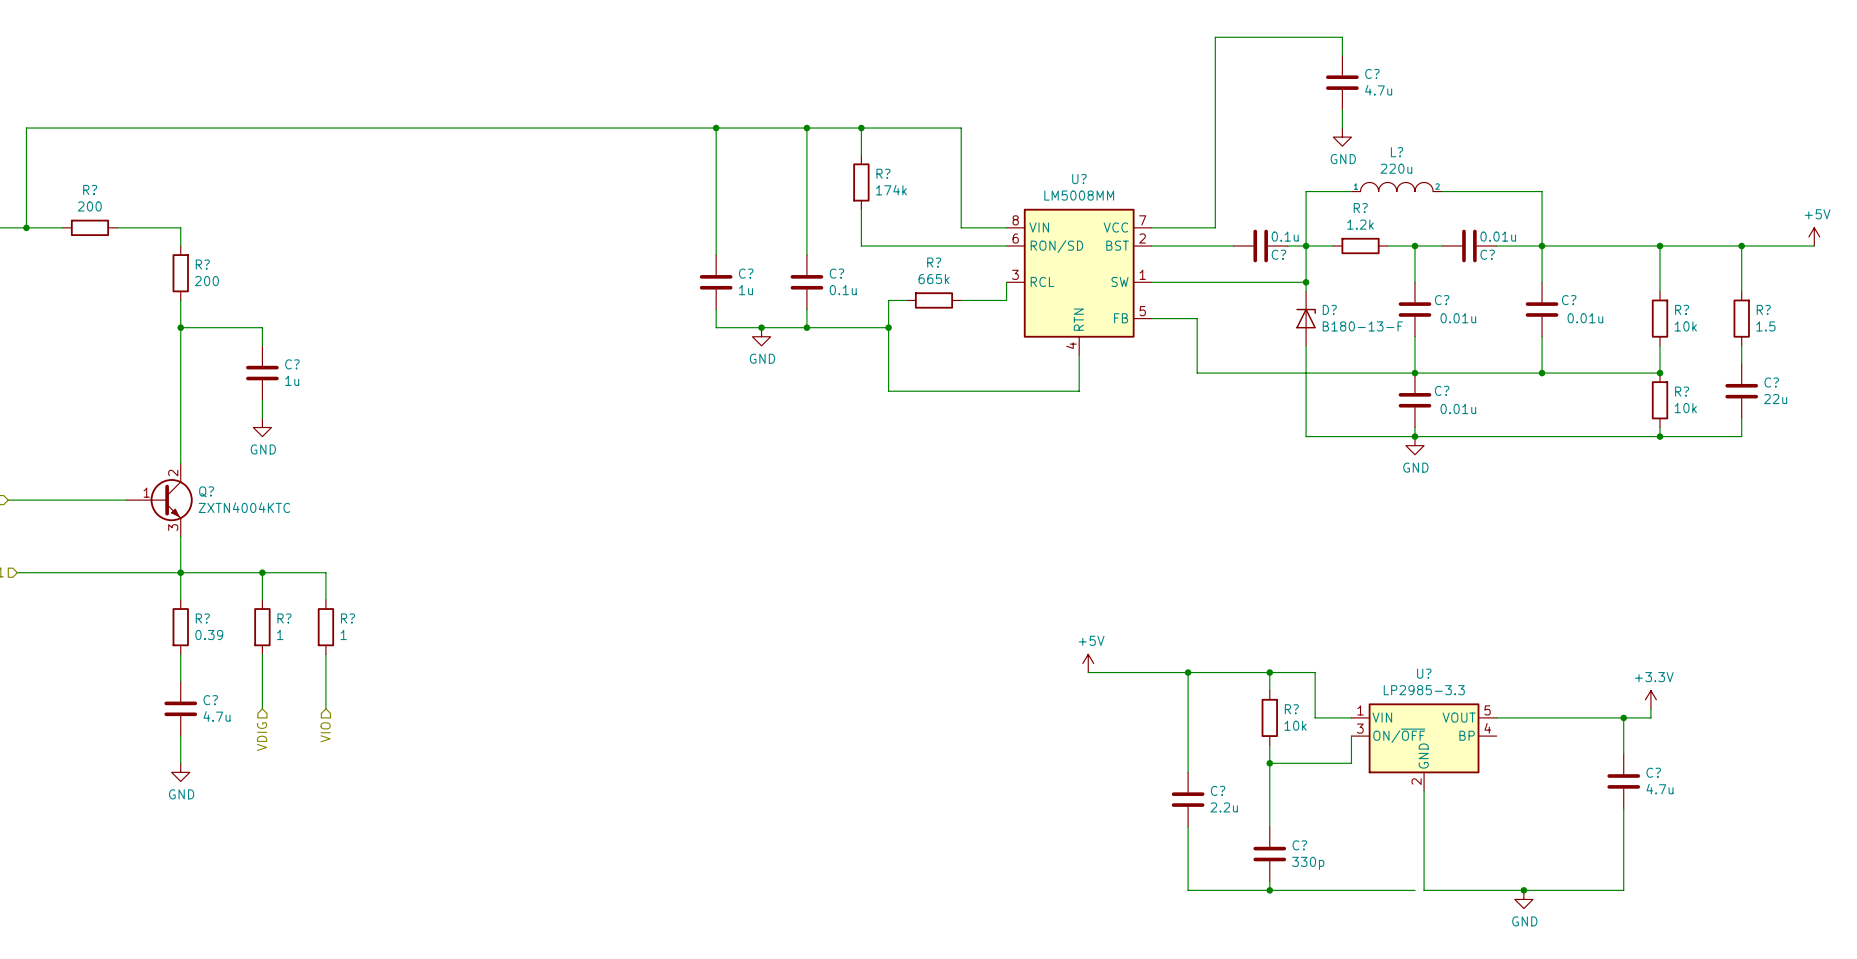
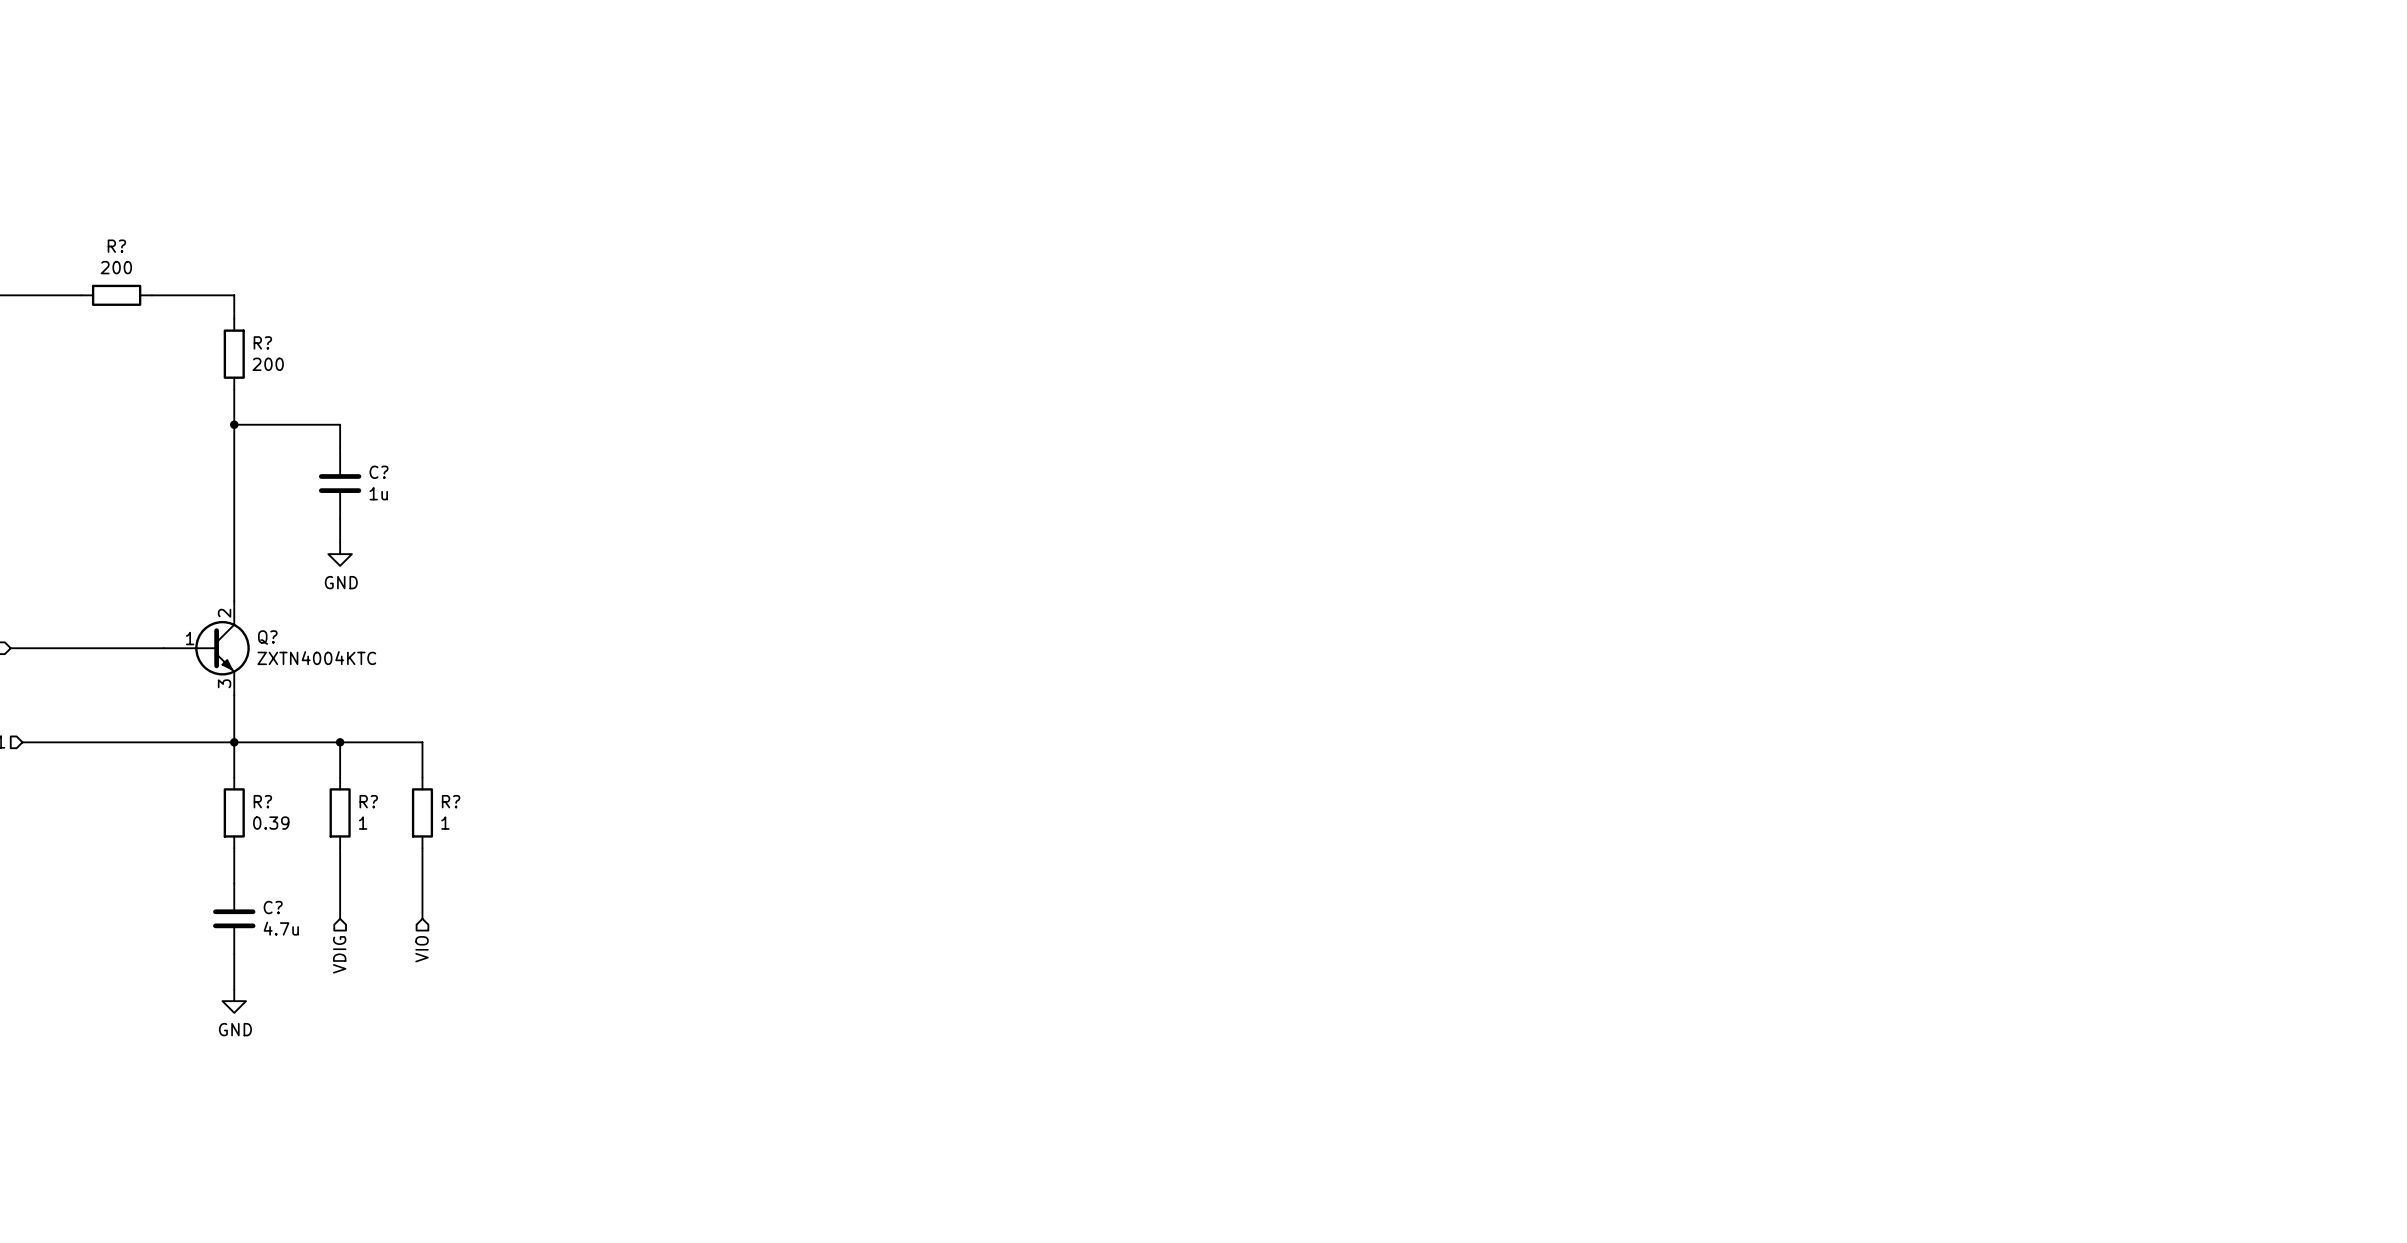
wire: (1342, 55) (1342, 37) (1215, 37) (1215, 227) (1151, 227) -> none
C?: 4.7u (1342, 82) -> none
wire: (1342, 109) (1342, 128) -> none
wire: (716, 128) (716, 255) -> none
junction: (716, 128) -> none
wire: (806, 128) (806, 255) -> none
junction: (806, 128) -> none
wire: (861, 128) (861, 155) -> none
junction: (861, 128) -> none
power symbol: GND (1342, 137) -> none
R?: 174k (861, 182) -> none
L?: 220u (1396, 187) -> none
wire: (1351, 191) (1306, 191) (1306, 291) -> none
wire: (1442, 191) (1542, 191) (1542, 282) -> none
wire: (861, 209) (861, 246) (1006, 246) -> none
wire: (26, 227) (26, 128) (961, 128) (961, 227) (1006, 227) -> none
junction: (26, 227) -> none
power symbol: +5V (1814, 236) -> none
wire: (1151, 246) (1233, 246) -> none
C?: 0.1u (1260, 246) -> none
wire: (1287, 246) (1333, 246) -> none
junction: (1306, 246) -> none
R?: 1.2k (1360, 246) -> none
wire: (1387, 246) (1442, 246) -> none
wire: (1414, 246) (1414, 282) -> none
junction: (1414, 246) -> none
C?: 0.01u (1469, 246) -> none
wire: (1496, 246) (1814, 246) -> none
junction: (1542, 246) -> none
wire: (1660, 246) (1660, 291) -> none
junction: (1660, 246) -> none
wire: (1741, 246) (1741, 291) -> none
junction: (1741, 246) -> none
U?: LM5008MM (1079, 281) -> none
C?: 1u (716, 282) -> none
C?: 0.1u (806, 282) -> none
wire: (1006, 282) (1006, 300) (961, 300) -> none
wire: (1151, 282) (1306, 282) -> none
junction: (1306, 282) -> none
wire: (906, 300) (888, 300) (888, 391) (1079, 391) (1079, 354) -> none
R?: 665k (933, 300) -> none
wire: (716, 309) (716, 327) (888, 327) -> none
wire: (806, 309) (806, 327) -> none
C?: 0.01u (1414, 309) -> none
C?: 0.01u (1542, 309) -> none
wire: (1151, 318) (1197, 318) (1197, 373) (1660, 373) (1660, 345) -> none
D?: B180-13-F (1306, 318) -> none
R?: 10k (1660, 318) -> none
R?: 1.5 (1741, 318) -> none
junction: (761, 327) -> none
junction: (806, 327) -> none
junction: (888, 327) -> none
power symbol: GND (761, 336) -> none
wire: (1414, 336) (1414, 373) -> none
wire: (1542, 336) (1542, 373) -> none
wire: (1306, 345) (1306, 436) (1741, 436) (1741, 418) -> none
wire: (1741, 345) (1741, 363) -> none
junction: (1414, 373) -> none
junction: (1542, 373) -> none
junction: (1660, 373) -> none
C?: 22u (1741, 391) -> none
C?: 0.01u (1414, 400) -> none
R?: 10k (1660, 400) -> none
wire: (1414, 427) (1414, 436) -> none
wire: (1660, 427) (1660, 436) -> none
junction: (1414, 436) -> none
junction: (1660, 436) -> none
power symbol: GND (1414, 445) -> none
power symbol: +5V (1088, 663) -> none
wire: (1088, 672) (1315, 672) (1315, 717) (1351, 717) -> none
wire: (1188, 672) (1188, 772) -> none
junction: (1188, 672) -> none
wire: (1269, 672) (1269, 690) -> none
junction: (1269, 672) -> none
power symbol: +3.3V (1650, 699) -> none
wire: (1650, 708) (1650, 717) (1496, 717) -> none
R?: 10k (1269, 717) -> none
wire: (1623, 717) (1623, 754) -> none
junction: (1623, 717) -> none
wire: (1351, 736) (1351, 763) (1269, 763) -> none
wire: (1269, 745) (1269, 826) -> none
U?: LP2985-3.3 (1424, 746) -> none
junction: (1269, 763) -> none
C?: 4.7u (1623, 781) -> none
wire: (1424, 790) (1424, 890) (1623, 890) (1623, 808) -> none
C?: 2.2u (1188, 799) -> none
wire: (1188, 826) (1188, 890) (1414, 890) -> none
C?: 330p (1269, 854) -> none
wire: (1269, 881) (1269, 890) -> none
junction: (1269, 890) -> none
junction: (1523, 890) -> none
power symbol: GND (1523, 899) -> none

